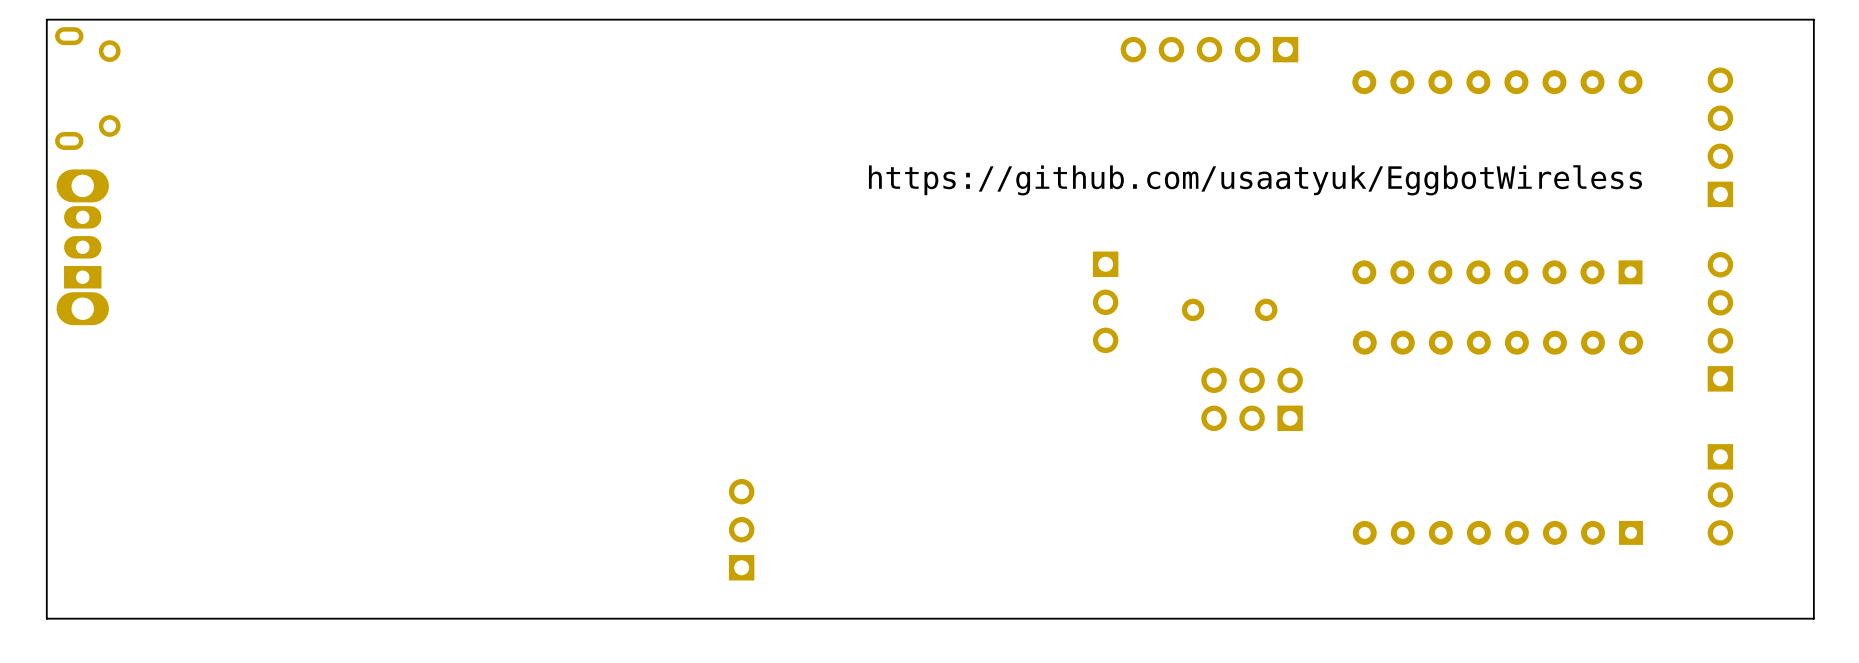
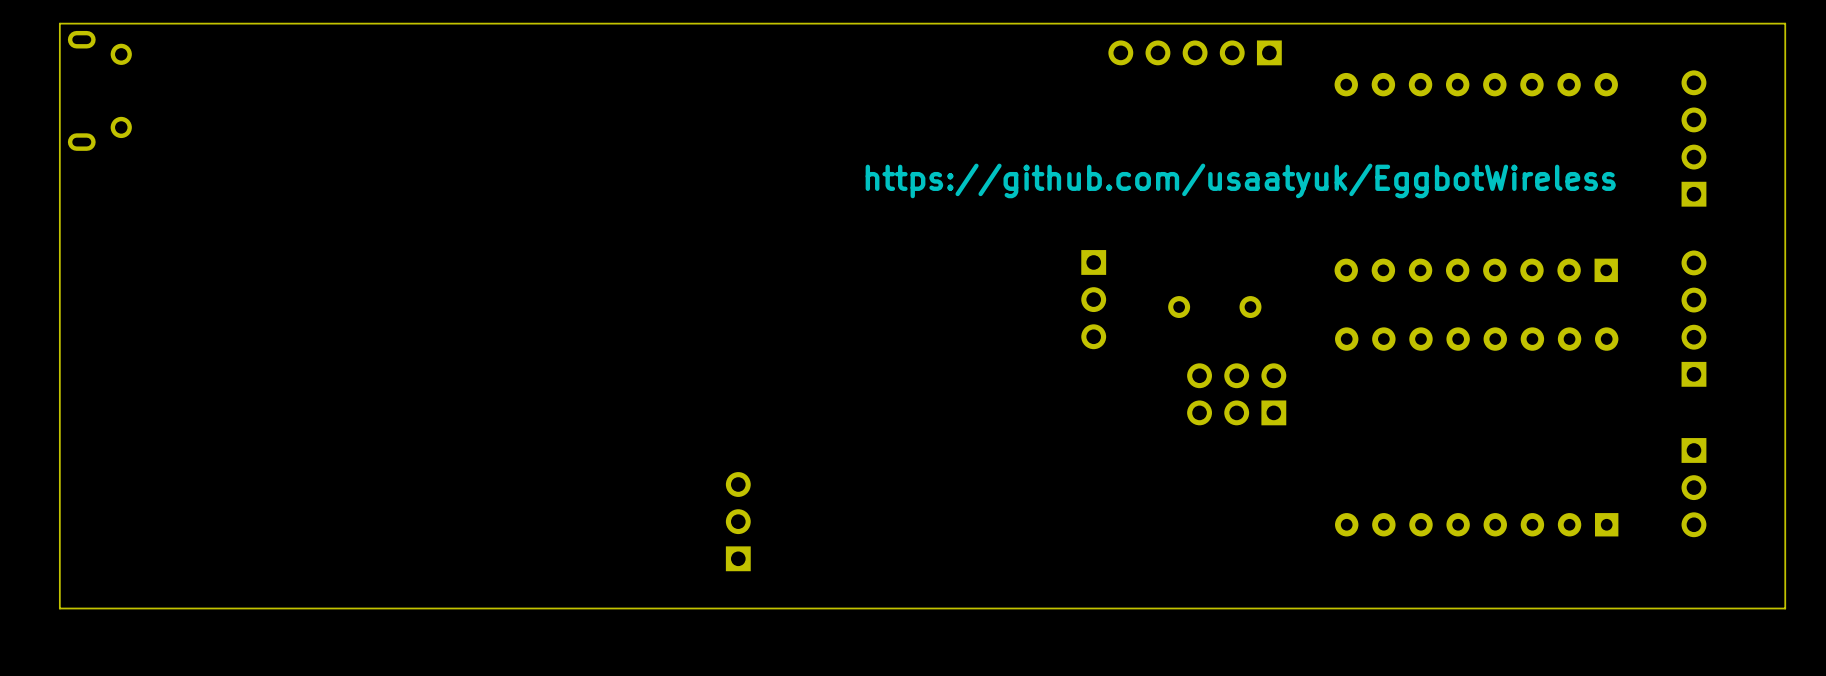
part: (82, 247) -> none

